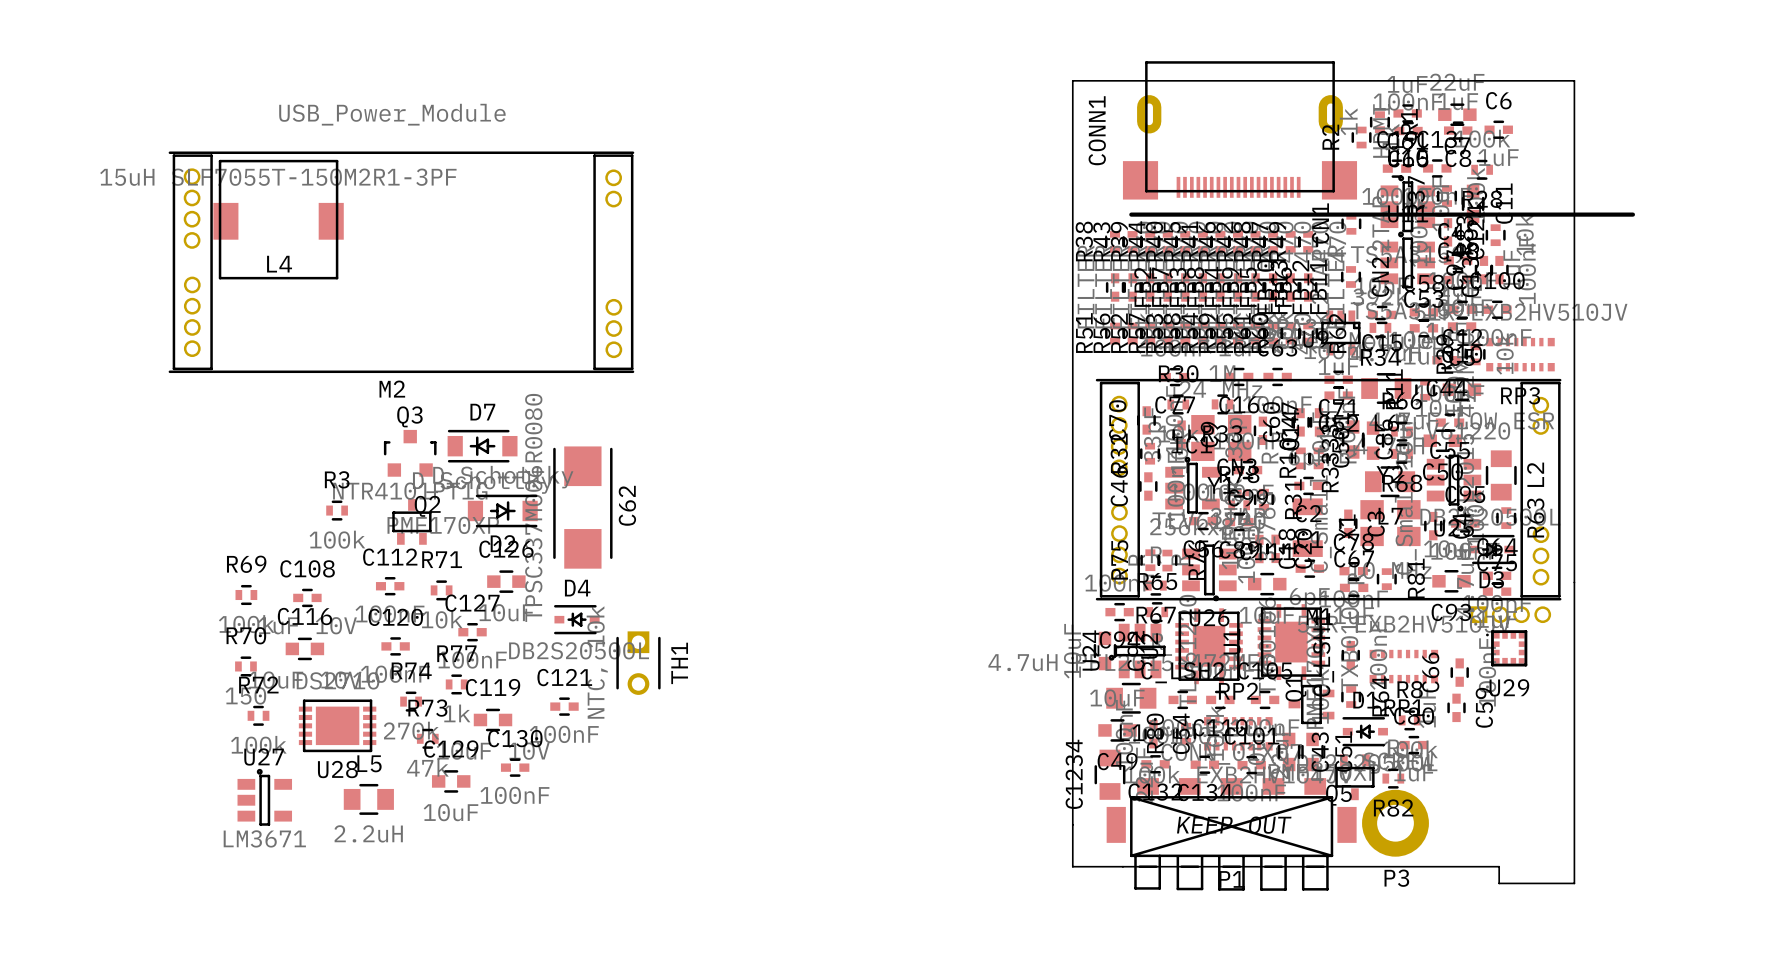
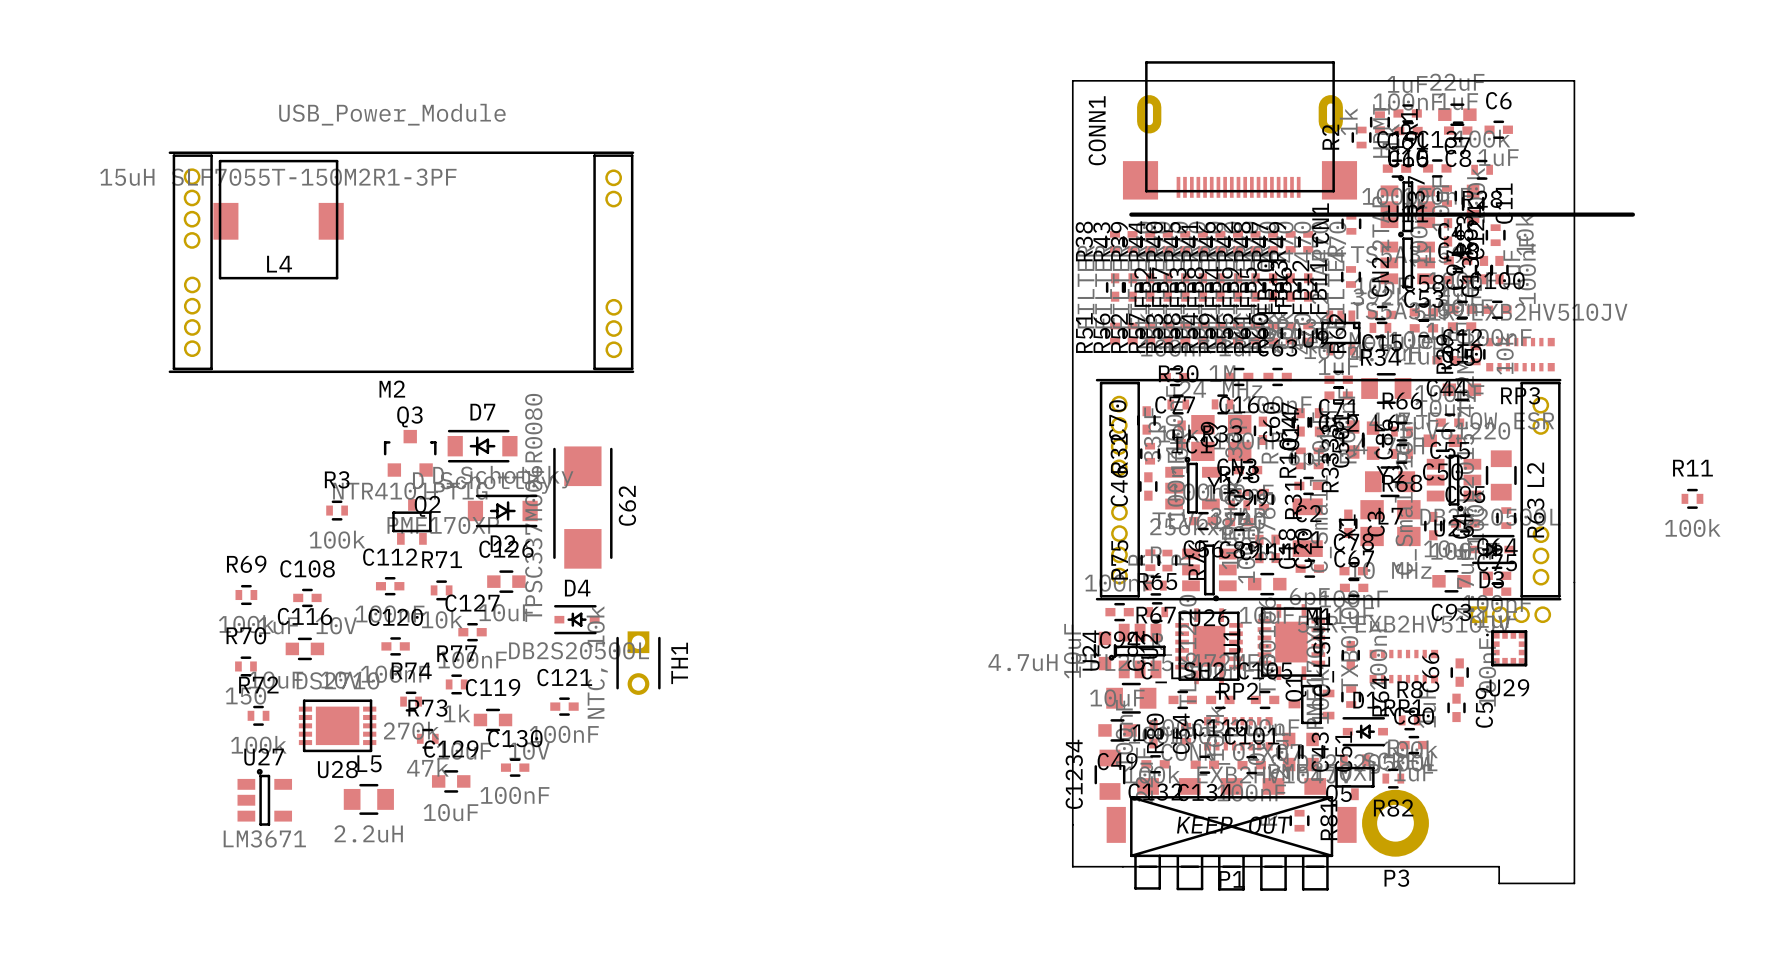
R11 rotation: 0° (1425, 389) -> 90° clockwise (1692, 498)
R11 position: (1425, 389) -> (1692, 498)
R81 position: (1386, 579) -> (1299, 820)

